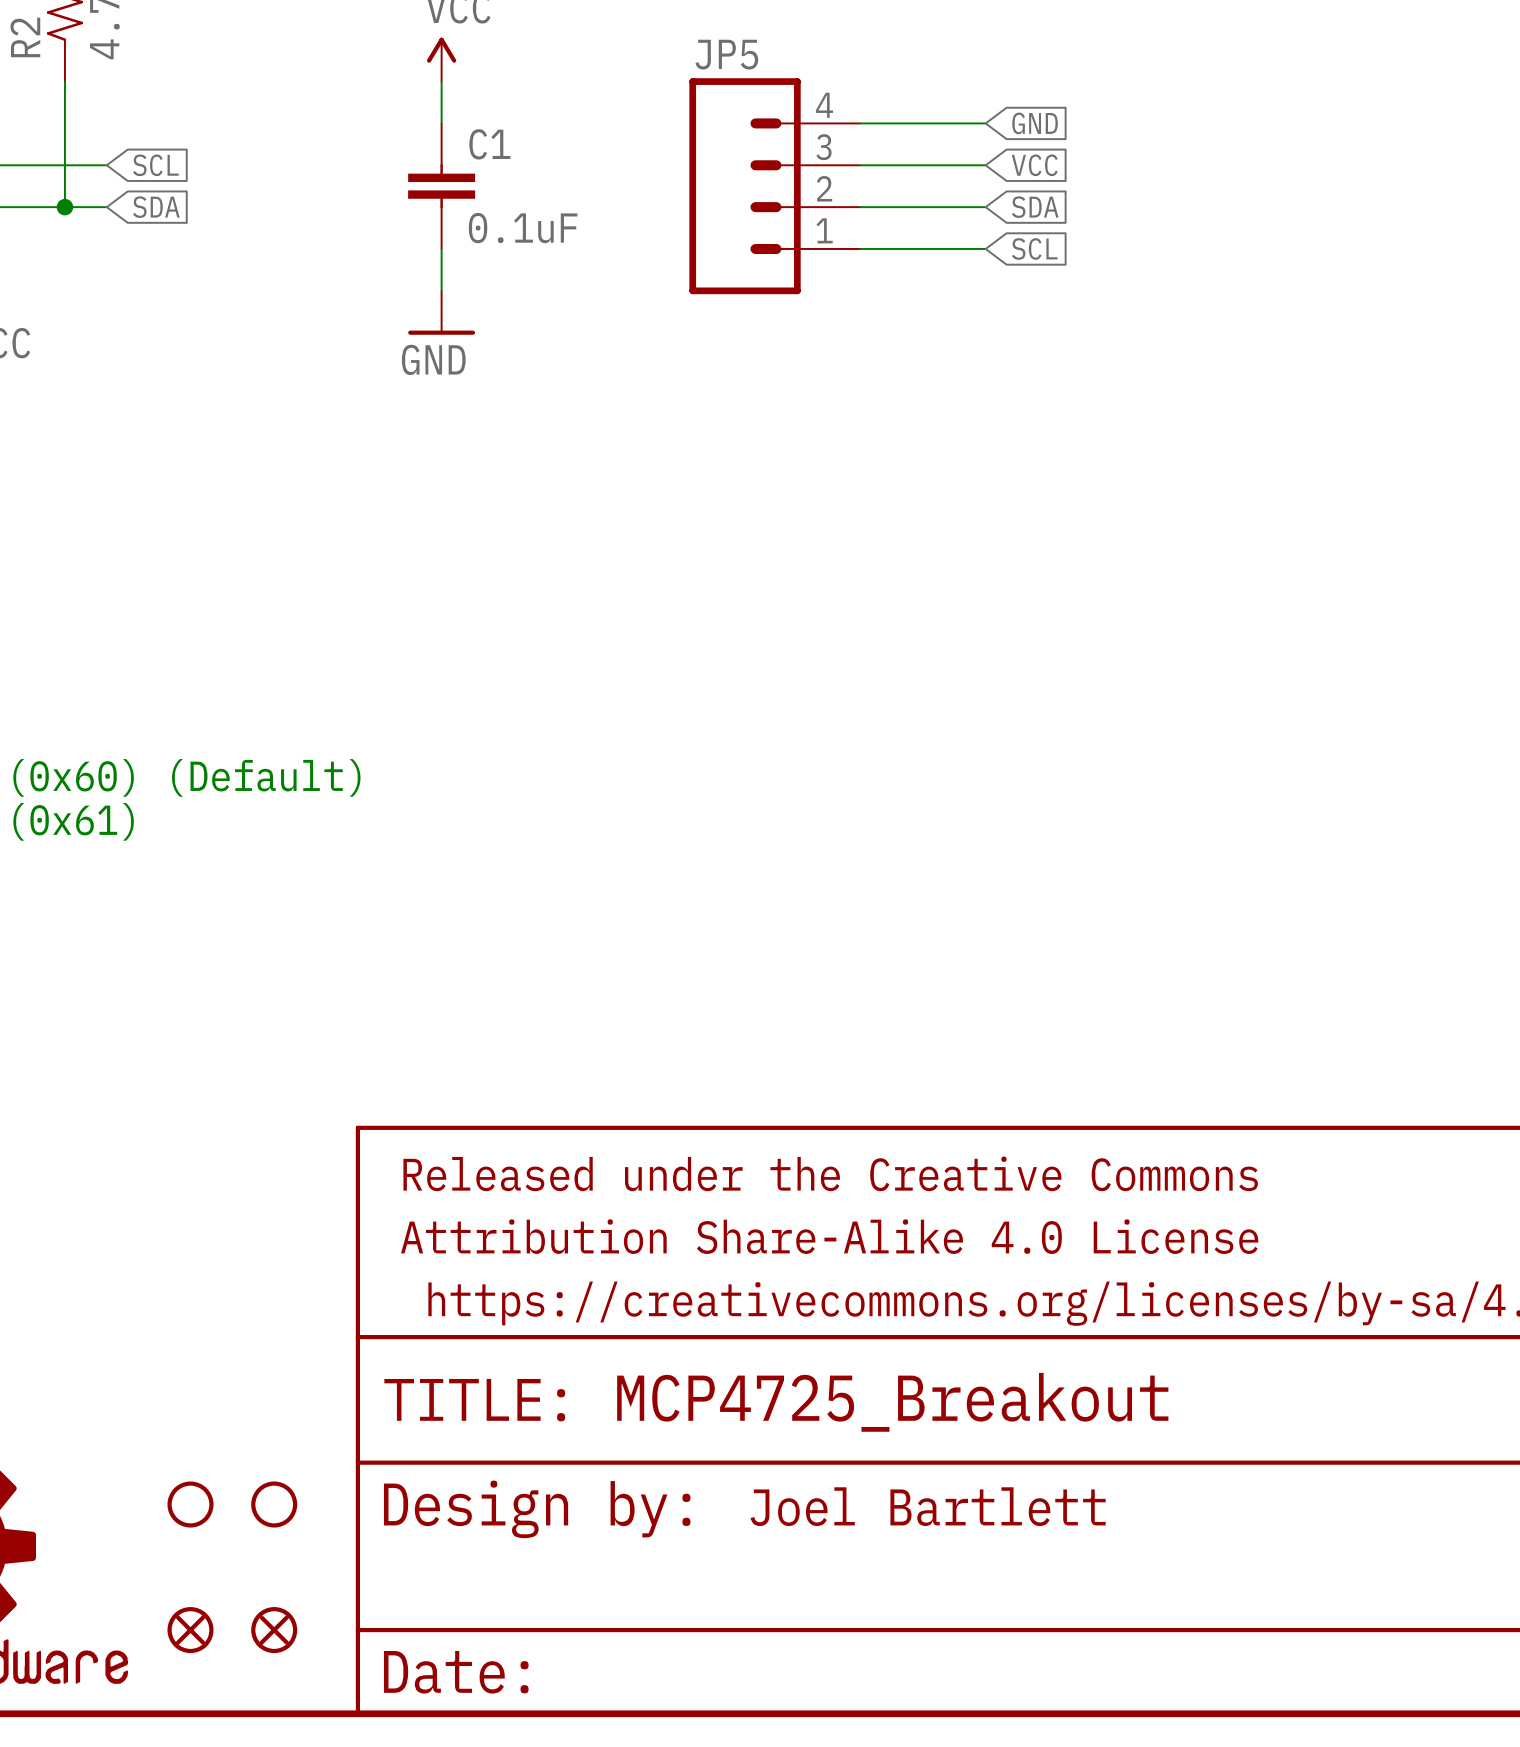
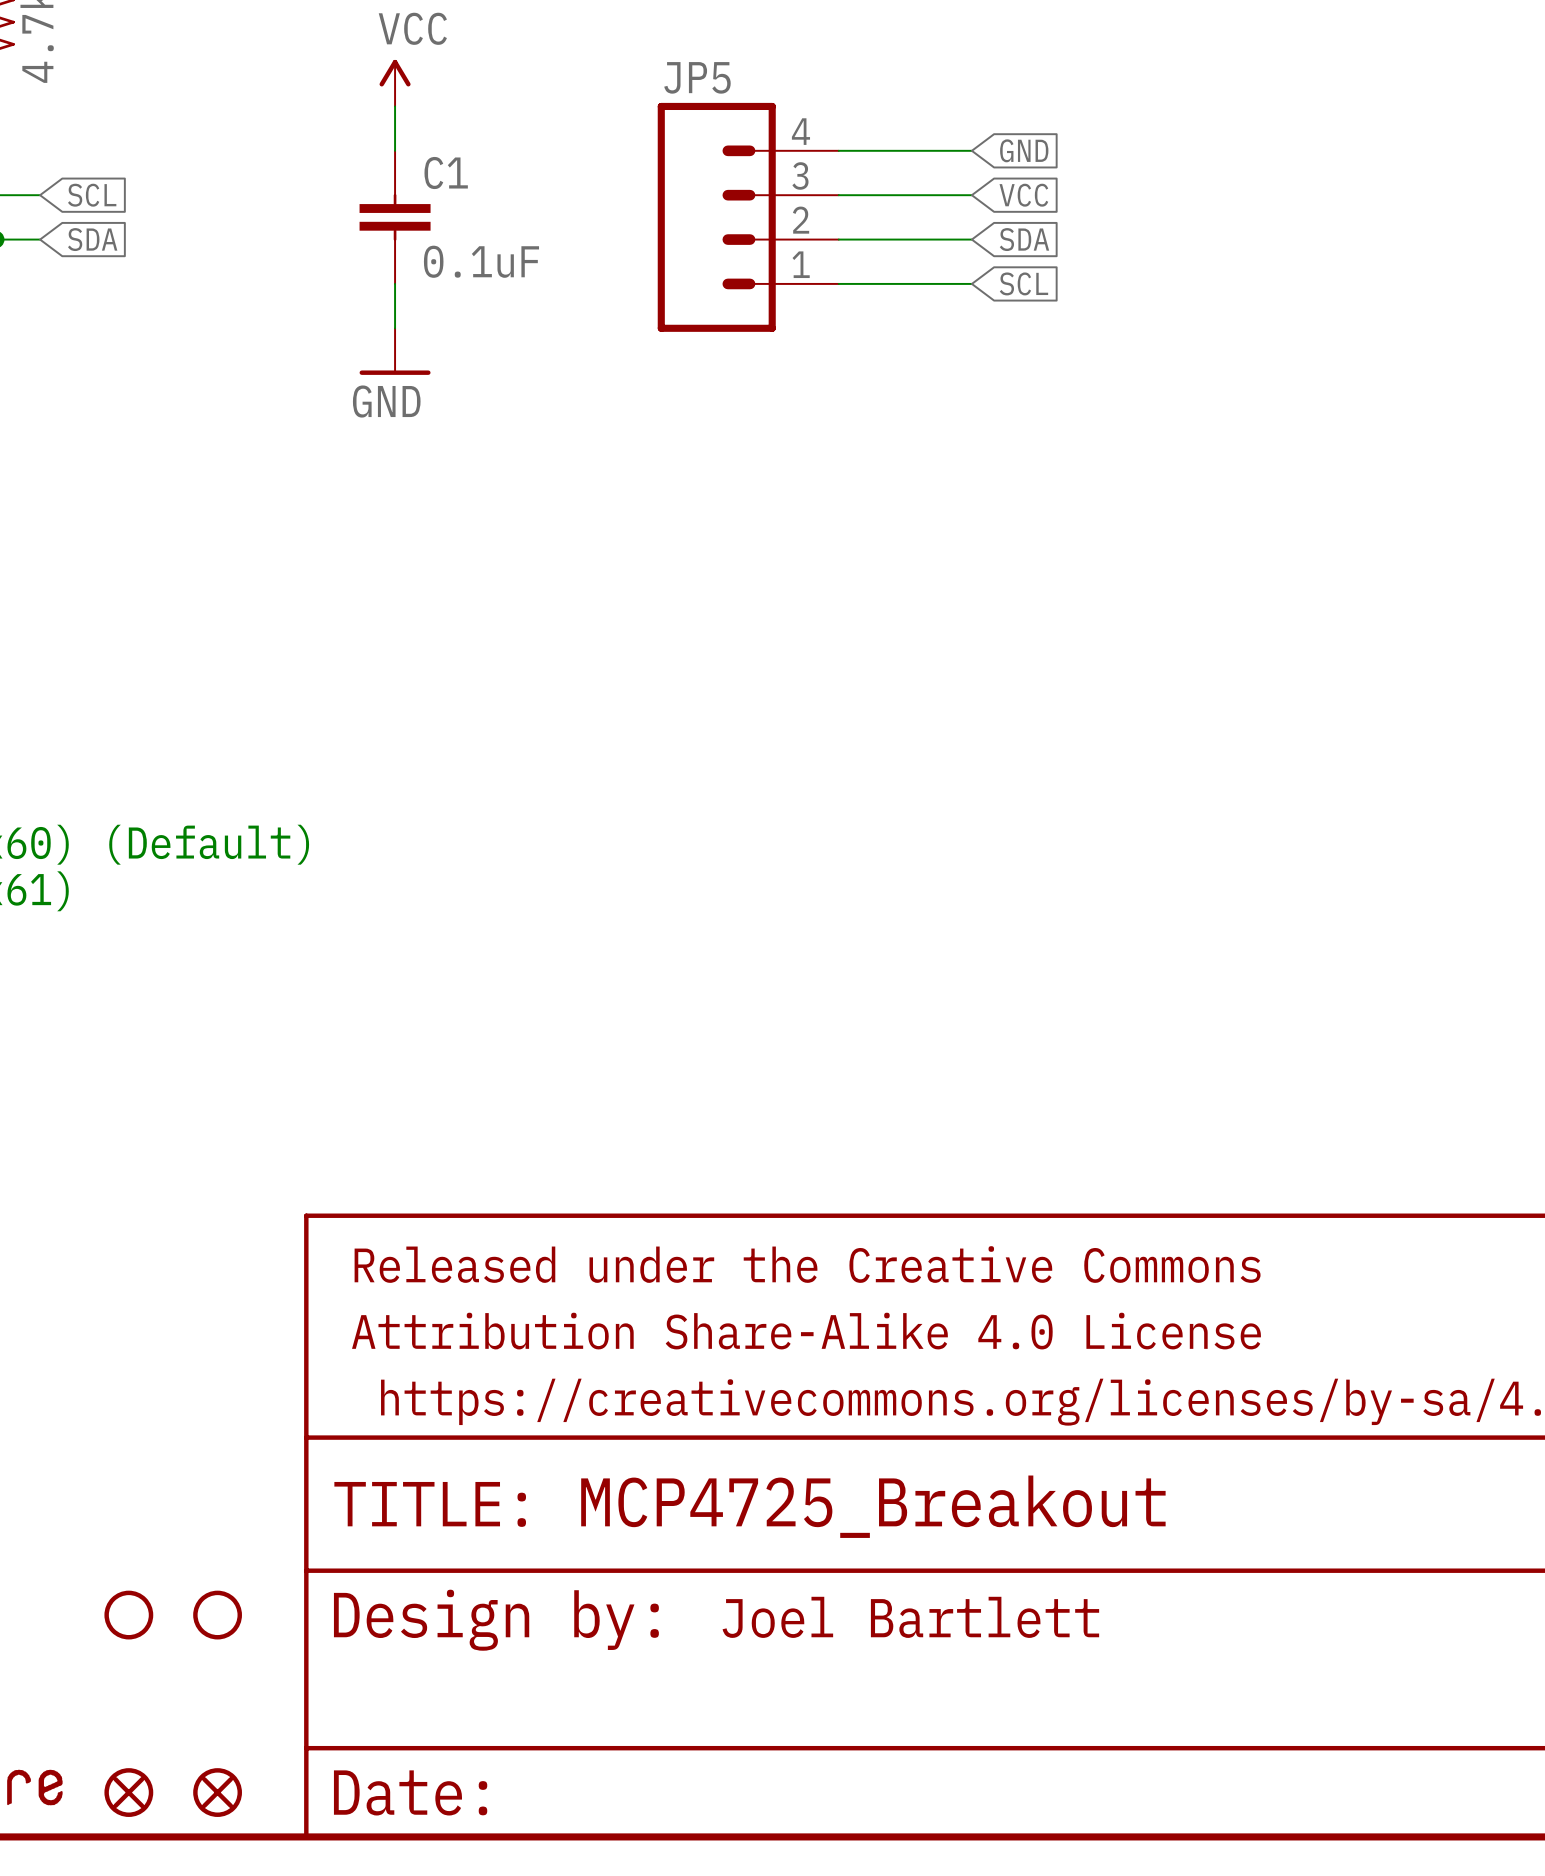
part position: (190, 1630) -> (128, 1792)
part position: (274, 1630) -> (217, 1792)

